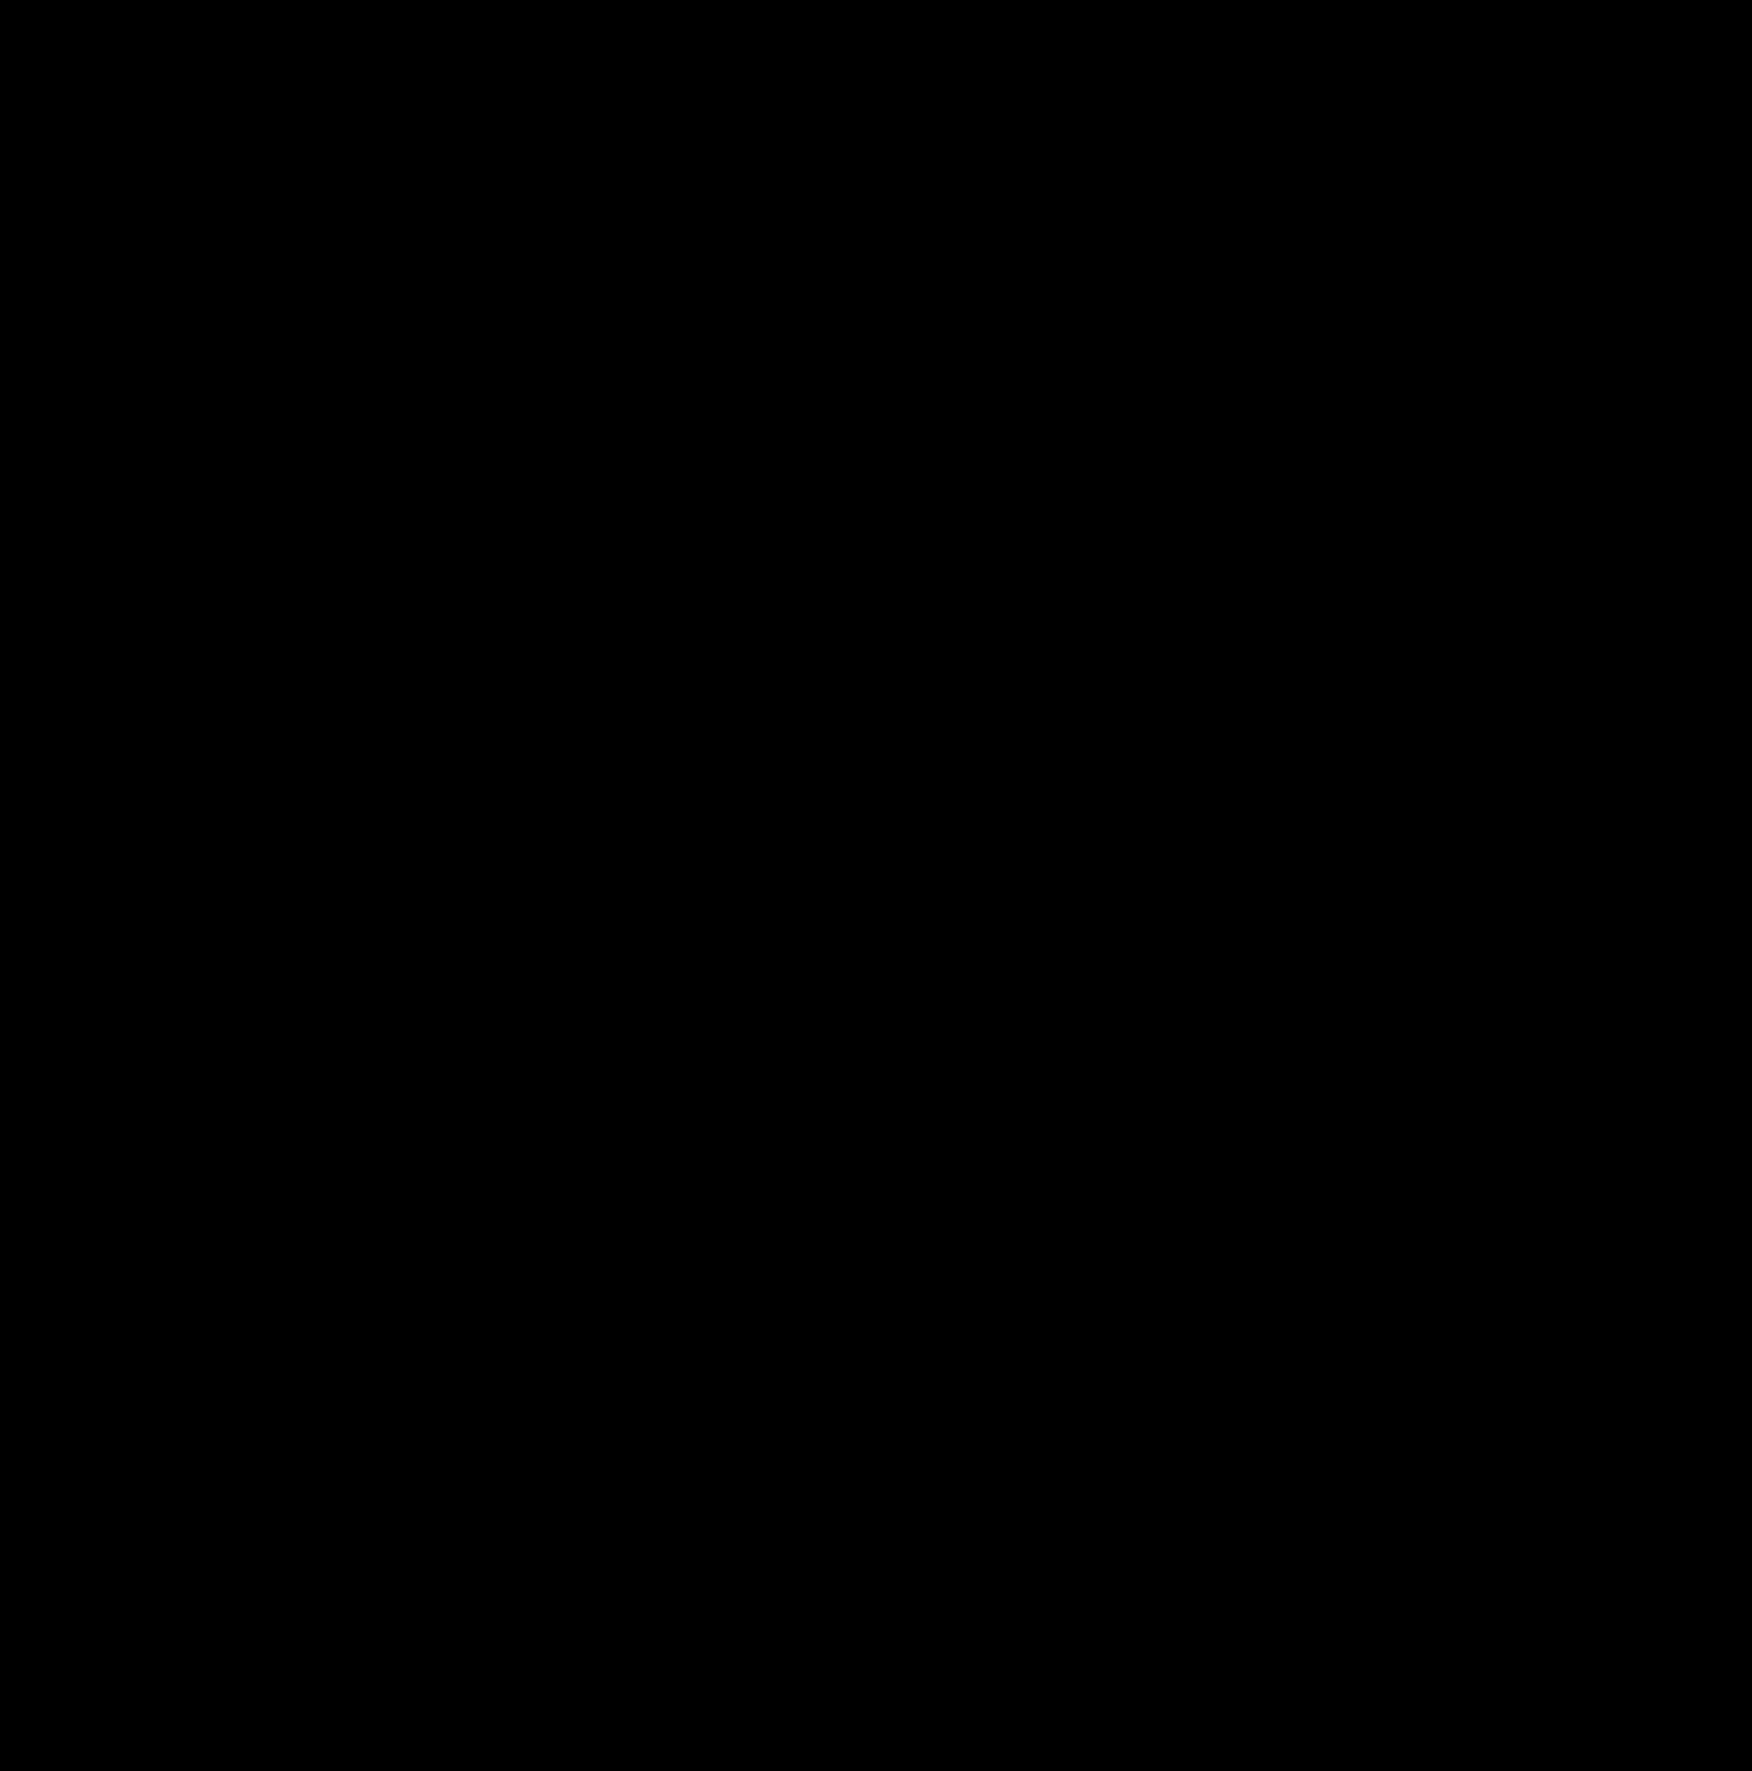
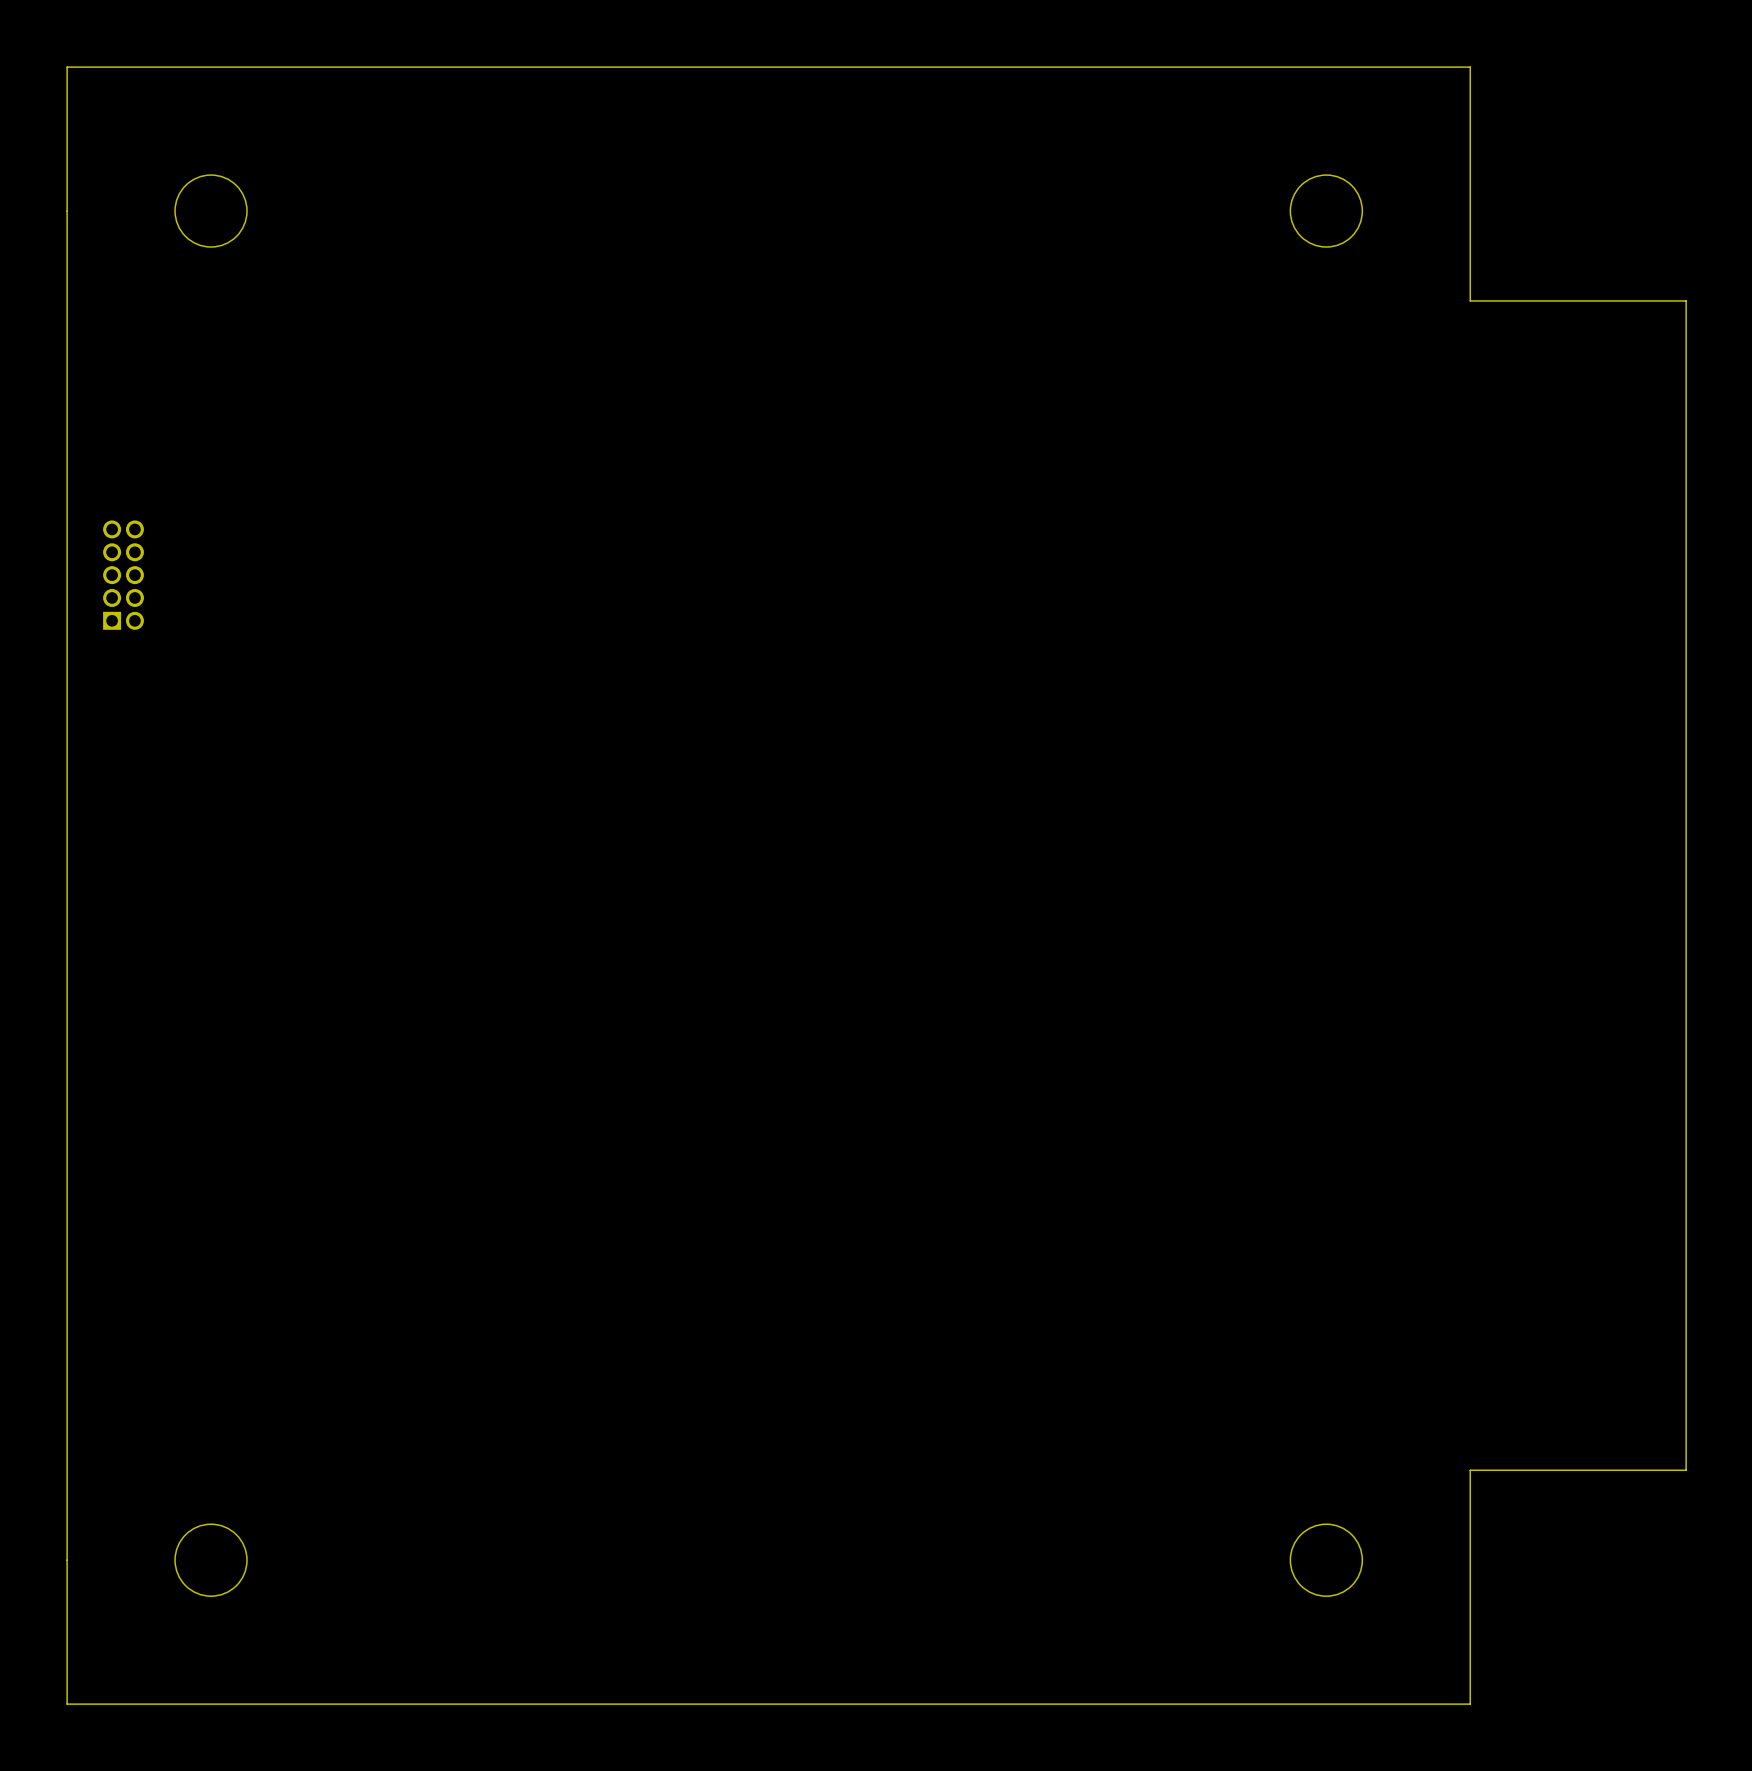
board edge: none -> (1470, 67) (1470, 300) (1686, 300) (1686, 1470) (1470, 1470) (1470, 1704) (67, 1704) (67, 67) (1470, 67)
round board edge: none -> [174, 174, 248, 248]
round board edge: none -> [1289, 174, 1363, 248]
part: none -> (123, 575)
round board edge: none -> [174, 1523, 248, 1597]
round board edge: none -> [1289, 1523, 1363, 1597]

